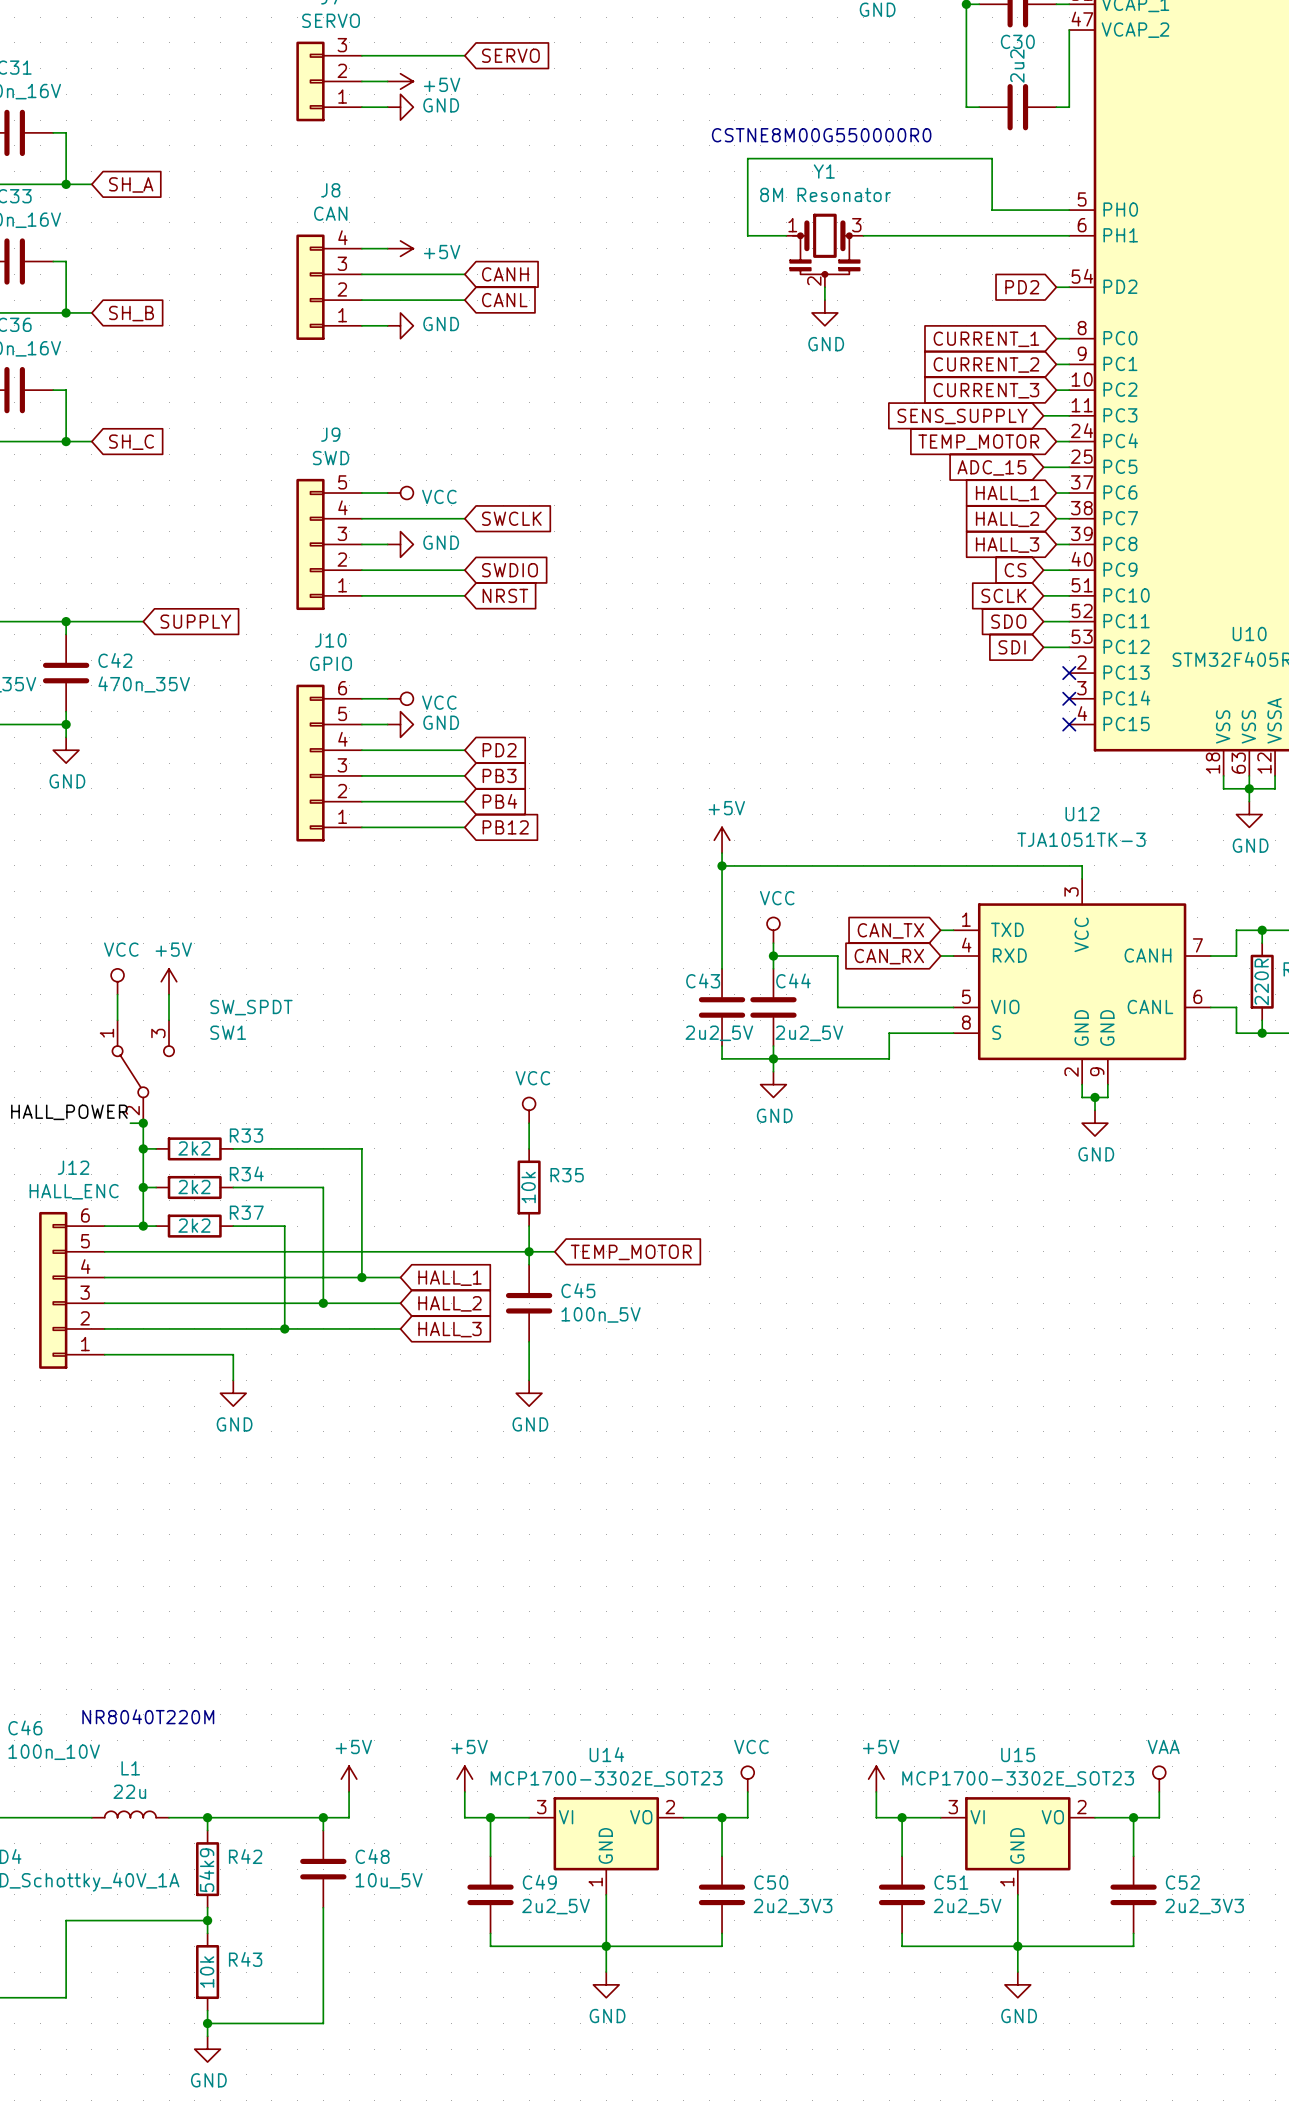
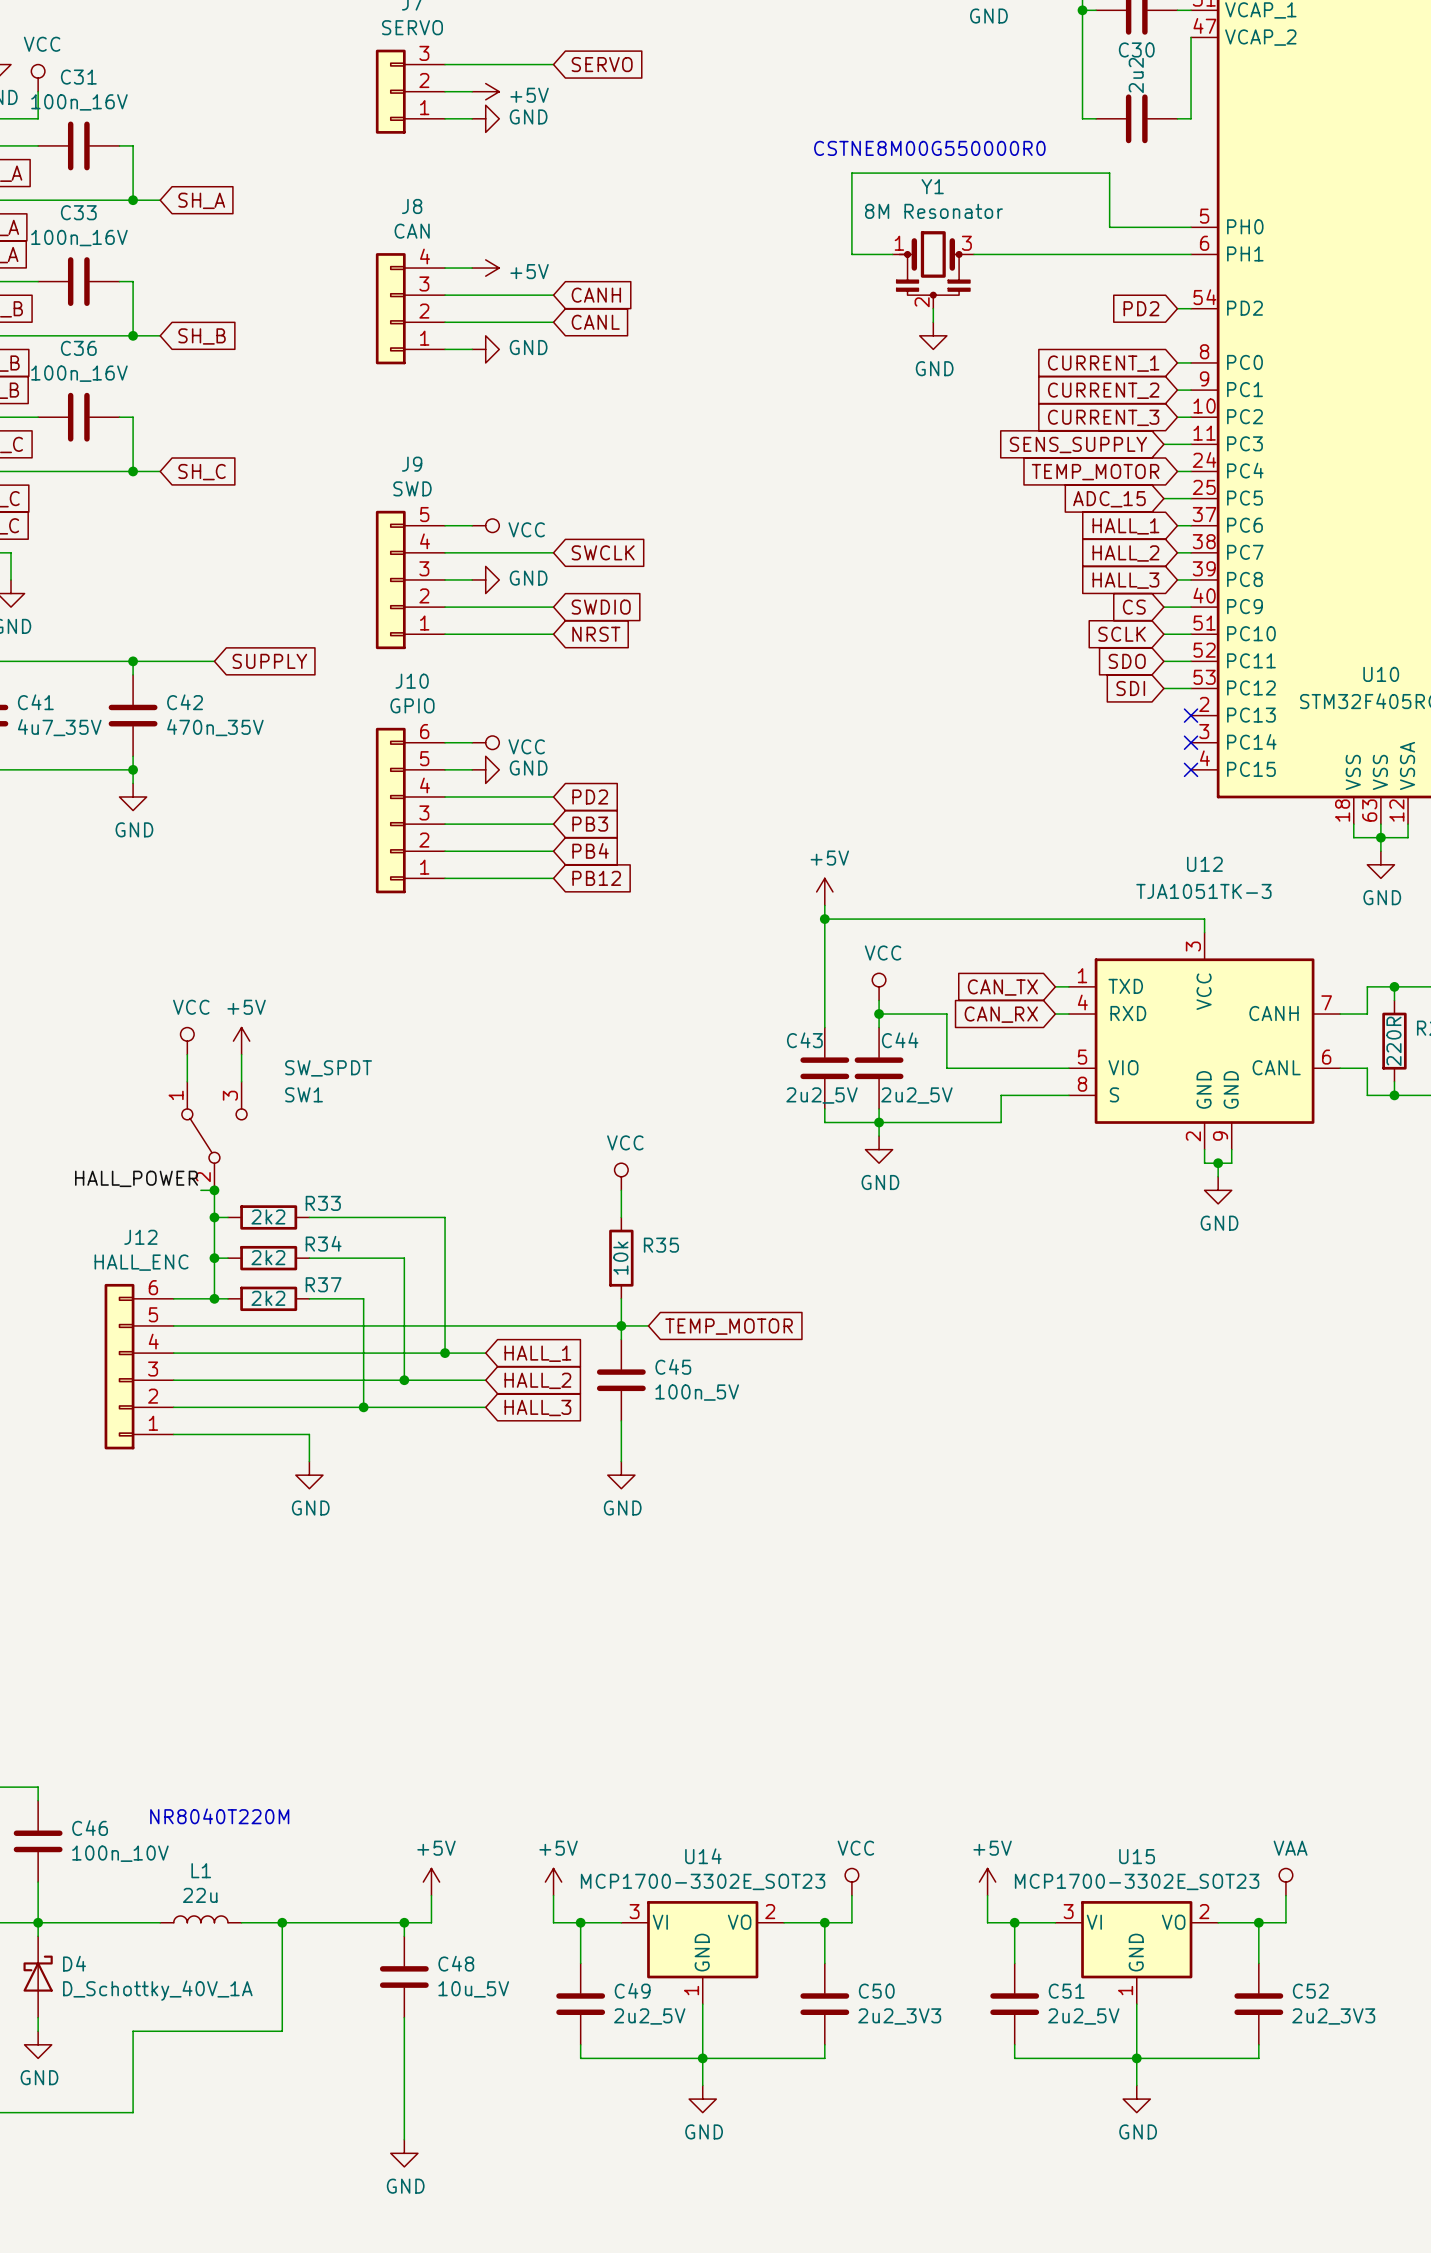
R42: 54k9 (207, 1869) -> none
wire: (207, 1920) (207, 1933) -> none
junction: (207, 1920) -> none
R43: 10k (207, 1972) -> none
wire: (207, 2010) (207, 2036) -> none
wire: (207, 2023) (323, 2023) -> none
junction: (207, 2023) -> none
power symbol position: GND (207, 2049) -> GND (404, 2153)

